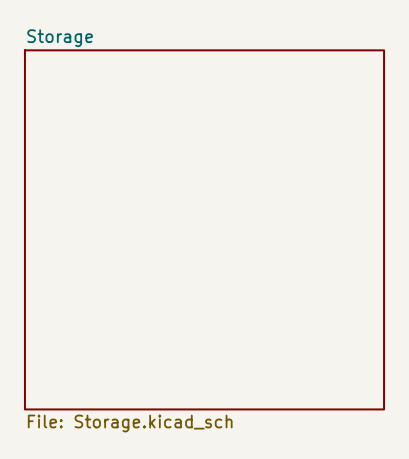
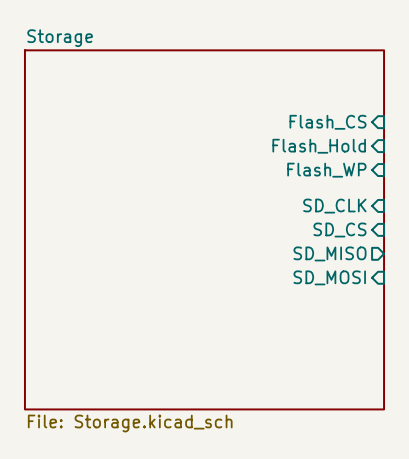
sheet pin: none -> Flash_CS (328, 122)
sheet pin: none -> Flash_Hold (319, 146)
sheet pin: none -> Flash_WP (326, 170)
sheet pin: none -> SD_CLK (334, 206)
sheet pin: none -> SD_CS (339, 230)
sheet pin: none -> SD_MISO (330, 253)
sheet pin: none -> SD_MOSI (329, 277)

